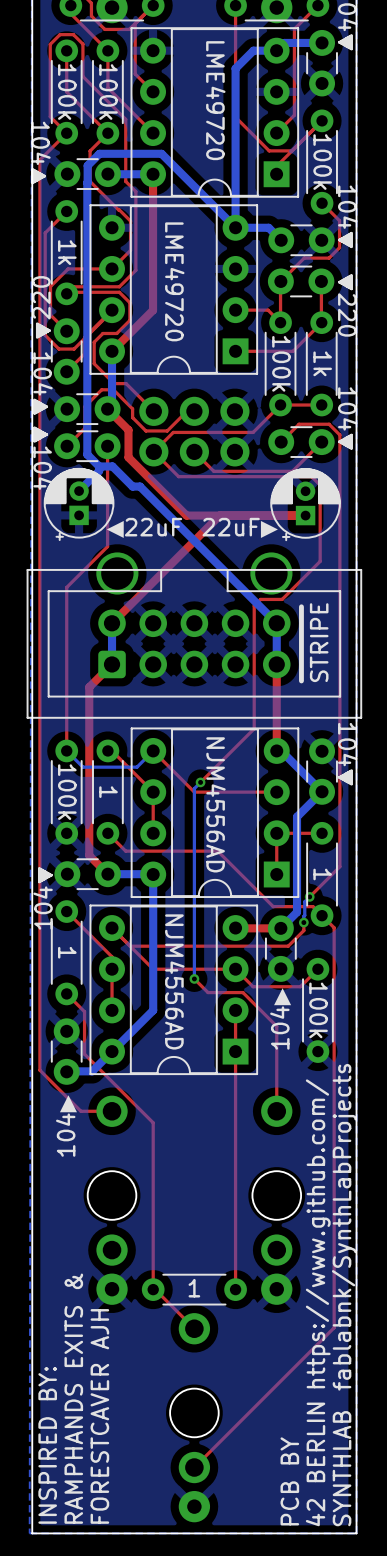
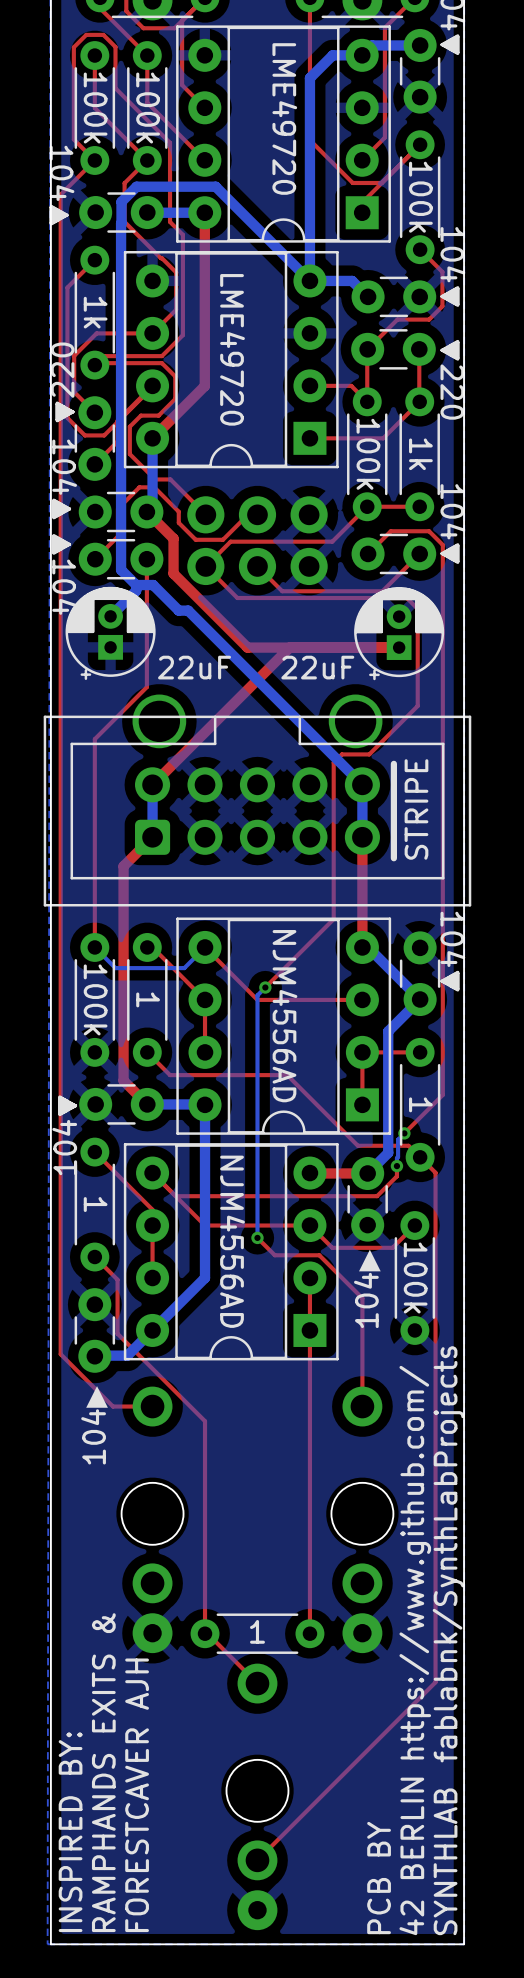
part text: ◀22uF (143, 528) -> none
part text: 22uF▶ (240, 528) -> none
part value: none -> 22uF (194, 667)
part value: none -> 22uF (317, 667)

